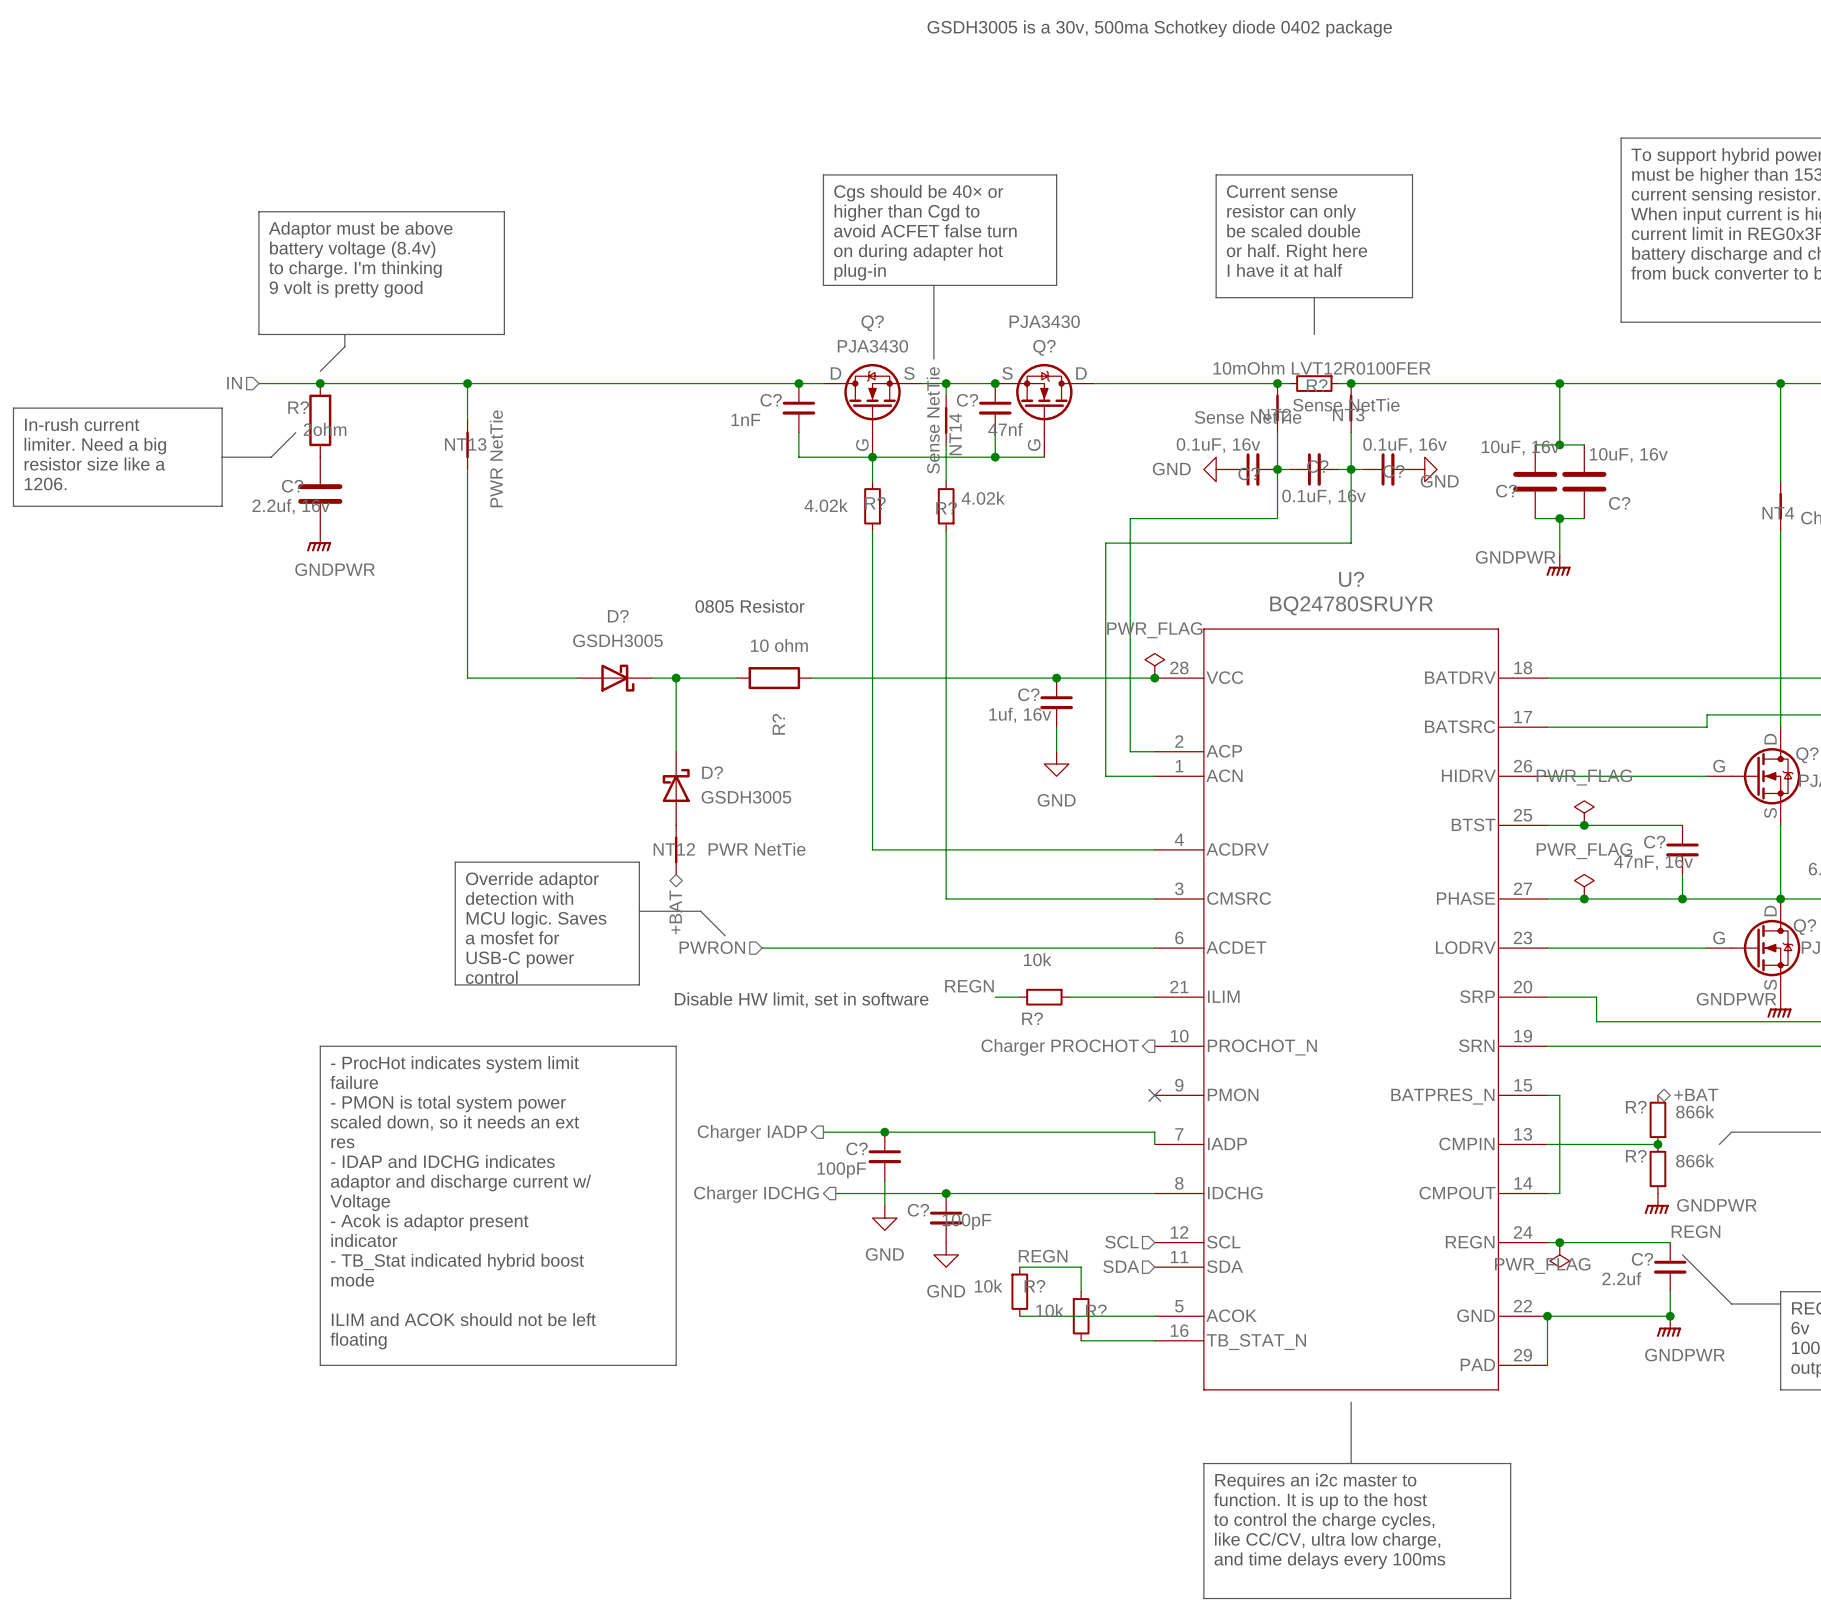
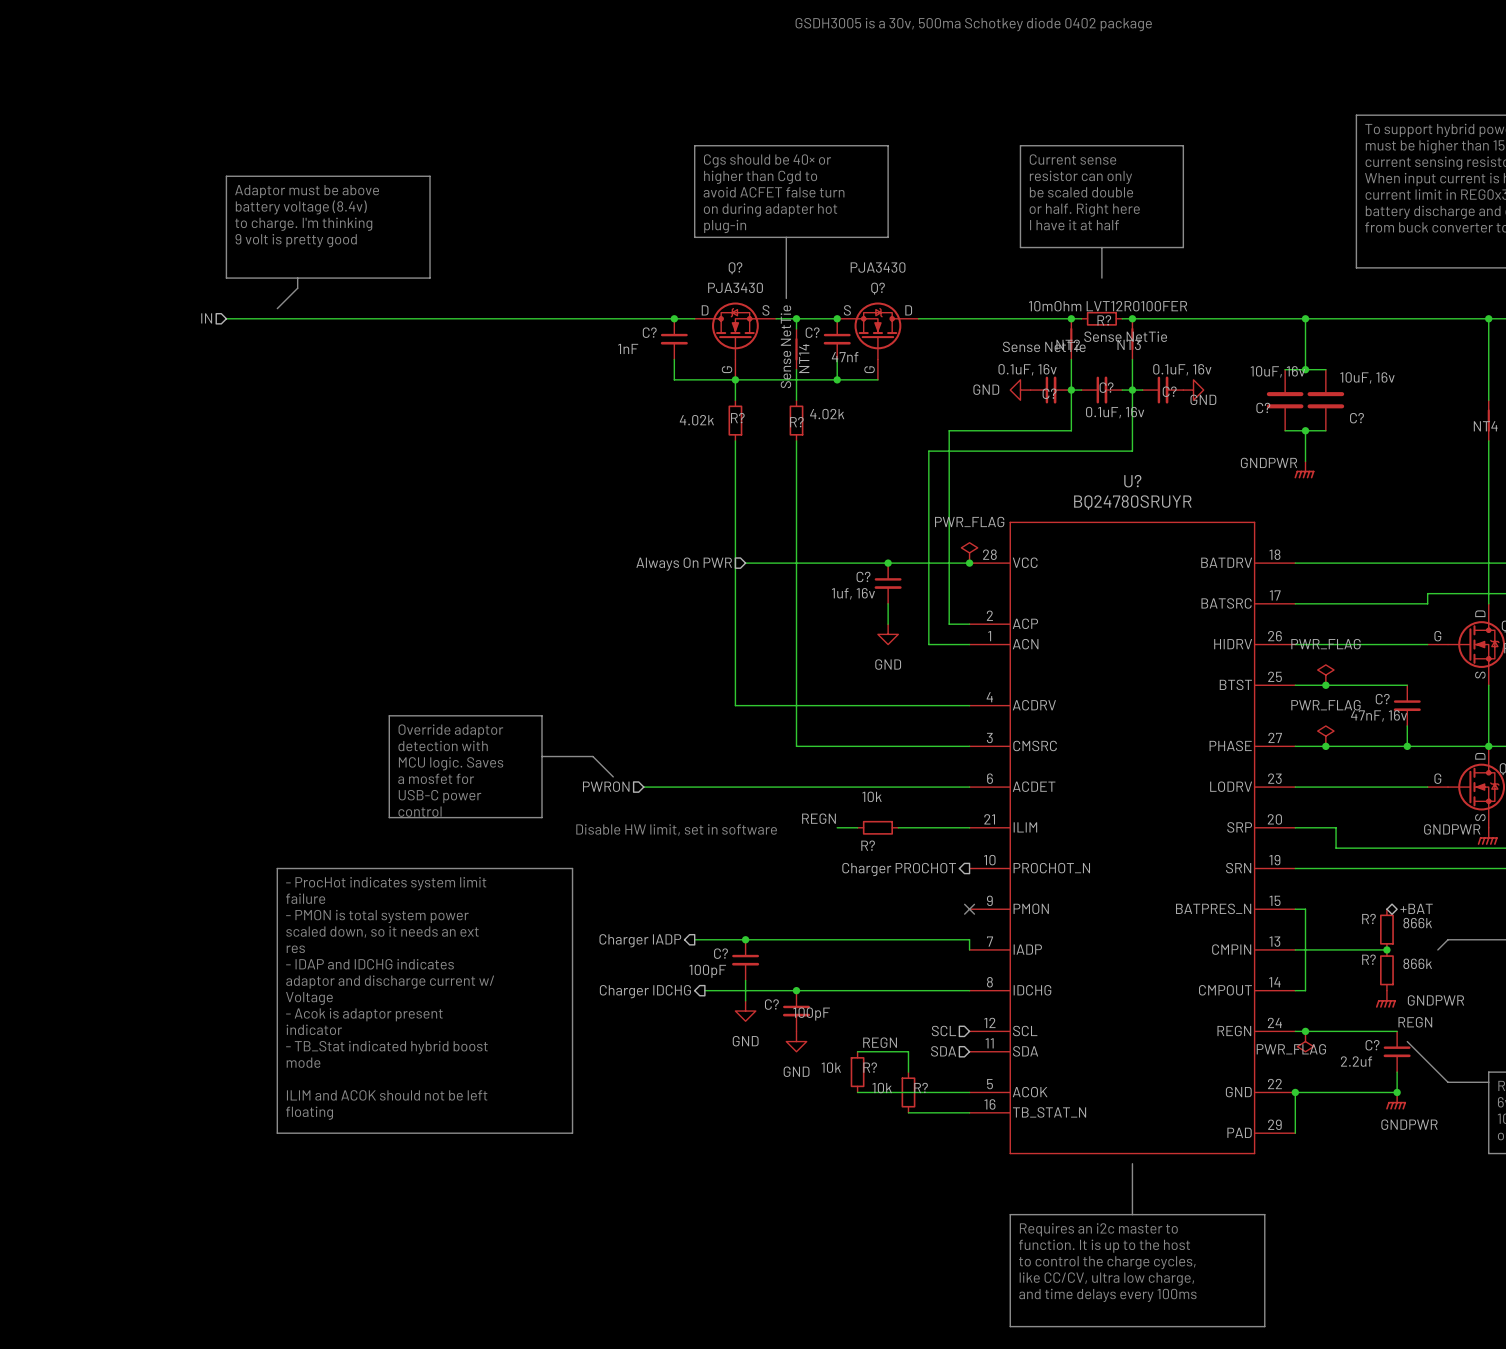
junction: (320, 383) -> none
wire: (467, 383) (467, 420) -> none
junction: (467, 383) -> none
line: (13, 408) (222, 408) (222, 506) (13, 506) (13, 408) -> none
R?: 2ohm (320, 420) -> none
text: In-rush current (82, 424) -> none
line: (295, 432) (271, 457) (222, 457) -> none
NT13: PWR NetTie (467, 444) -> none
text: limiter. Need a big (95, 446) -> none
text: resistor size like a (94, 464) -> none
wire: (467, 469) (467, 678) (578, 678) -> none
text: 1206. (45, 484) -> none
C?: 2.2uf, 16v (320, 494) -> none
power symbol: GNDPWR (319, 541) -> none
text: 0805 Resistor (750, 606) -> none
D?: GSDH3005 (614, 678) -> none
wire: (651, 678) (737, 678) -> none
wire: (676, 678) (676, 751) -> none
junction: (676, 678) -> none
R?: 10 ohm (774, 678) -> none
wire: (811, 678) (884, 678) -> none
hierarchical label: none -> Always On PWR (684, 564)
D?: GSDH3005 (676, 788) -> none
NT12: PWR NetTie (676, 849) -> none
hierarchical label: +BAT (675, 912) -> none

